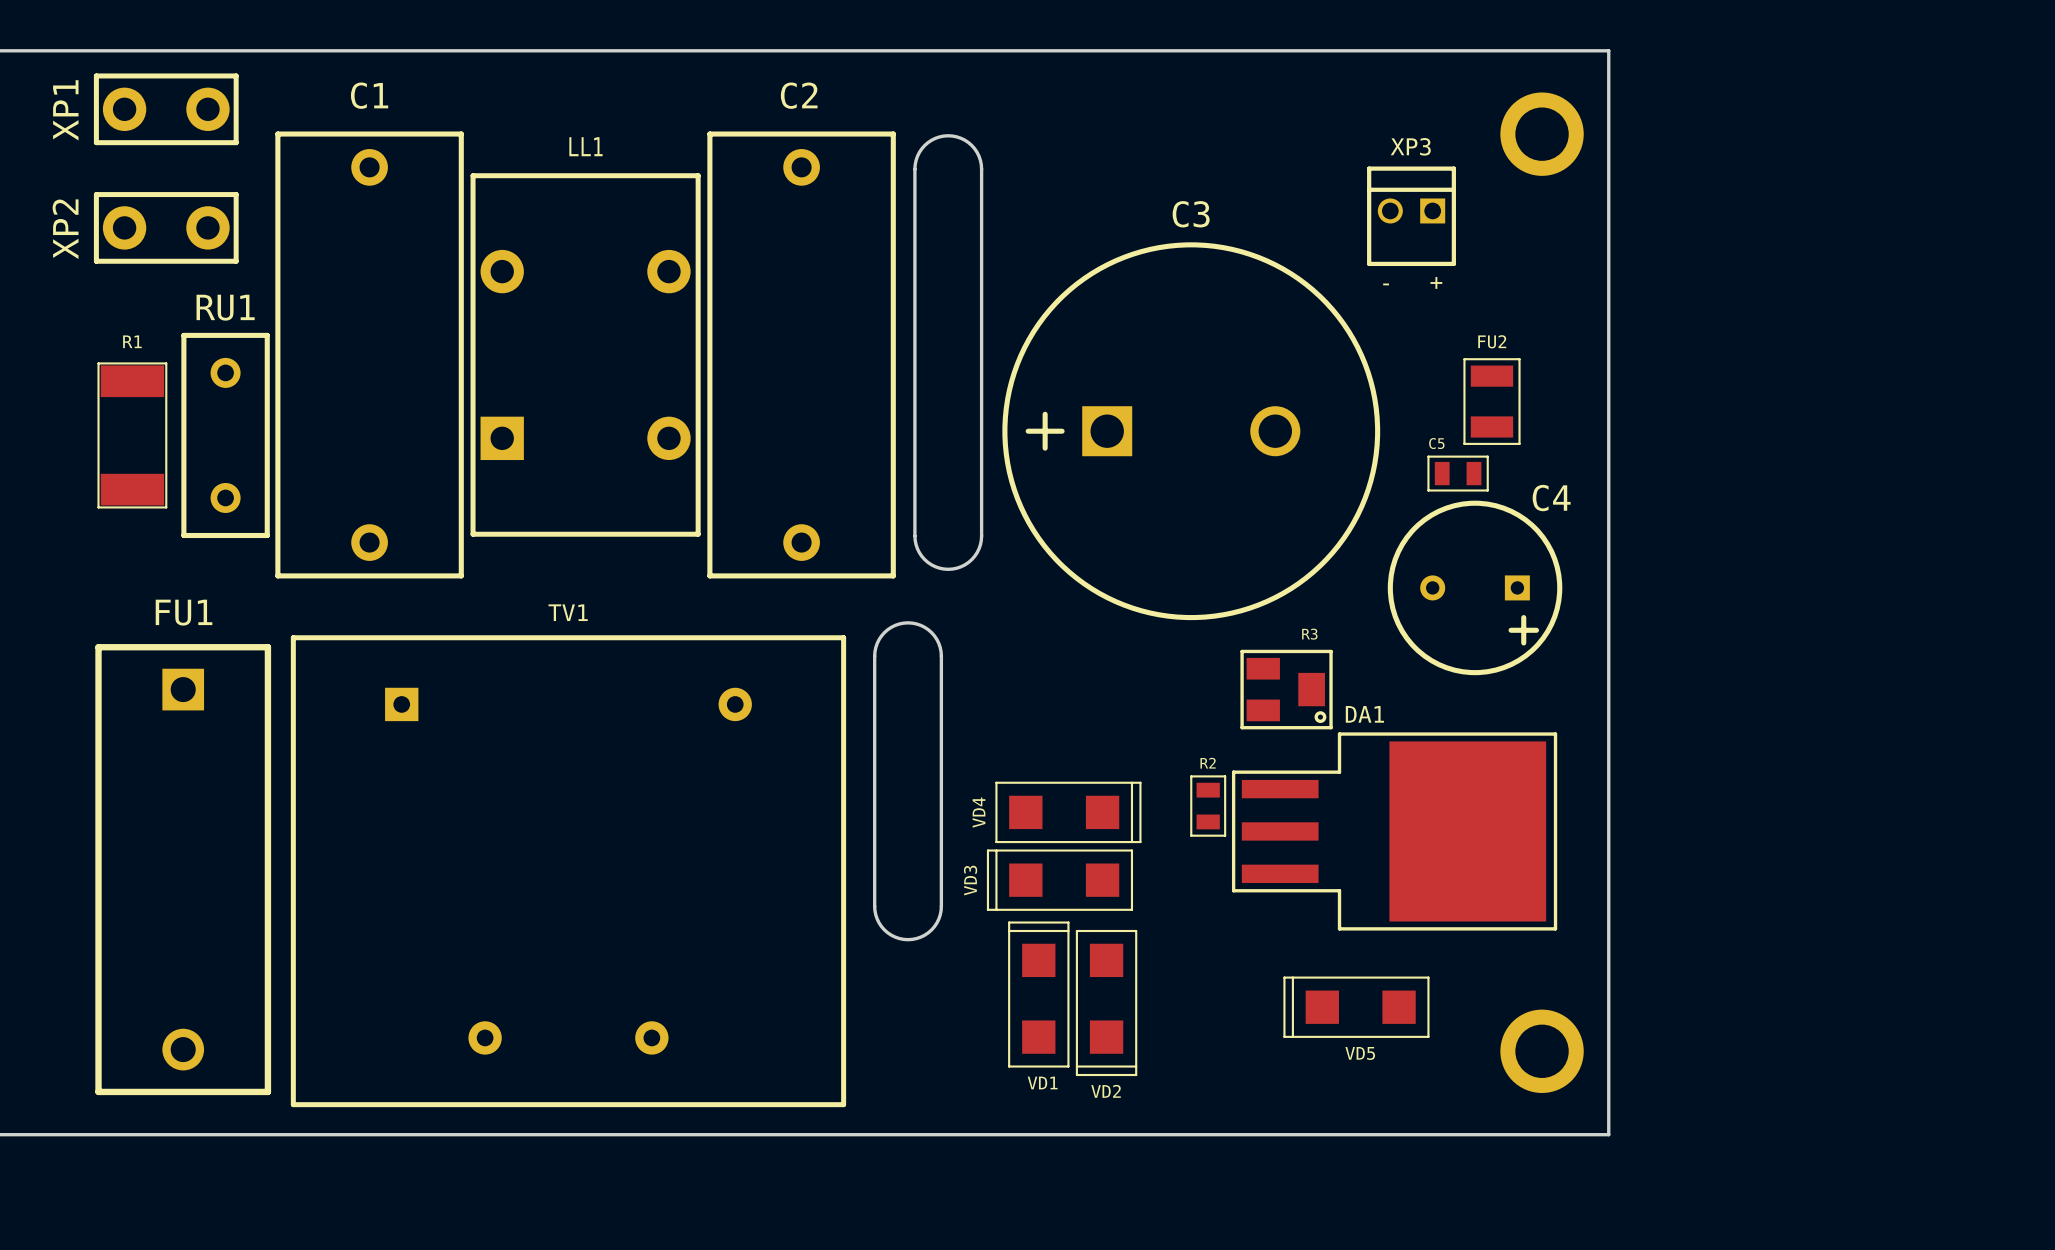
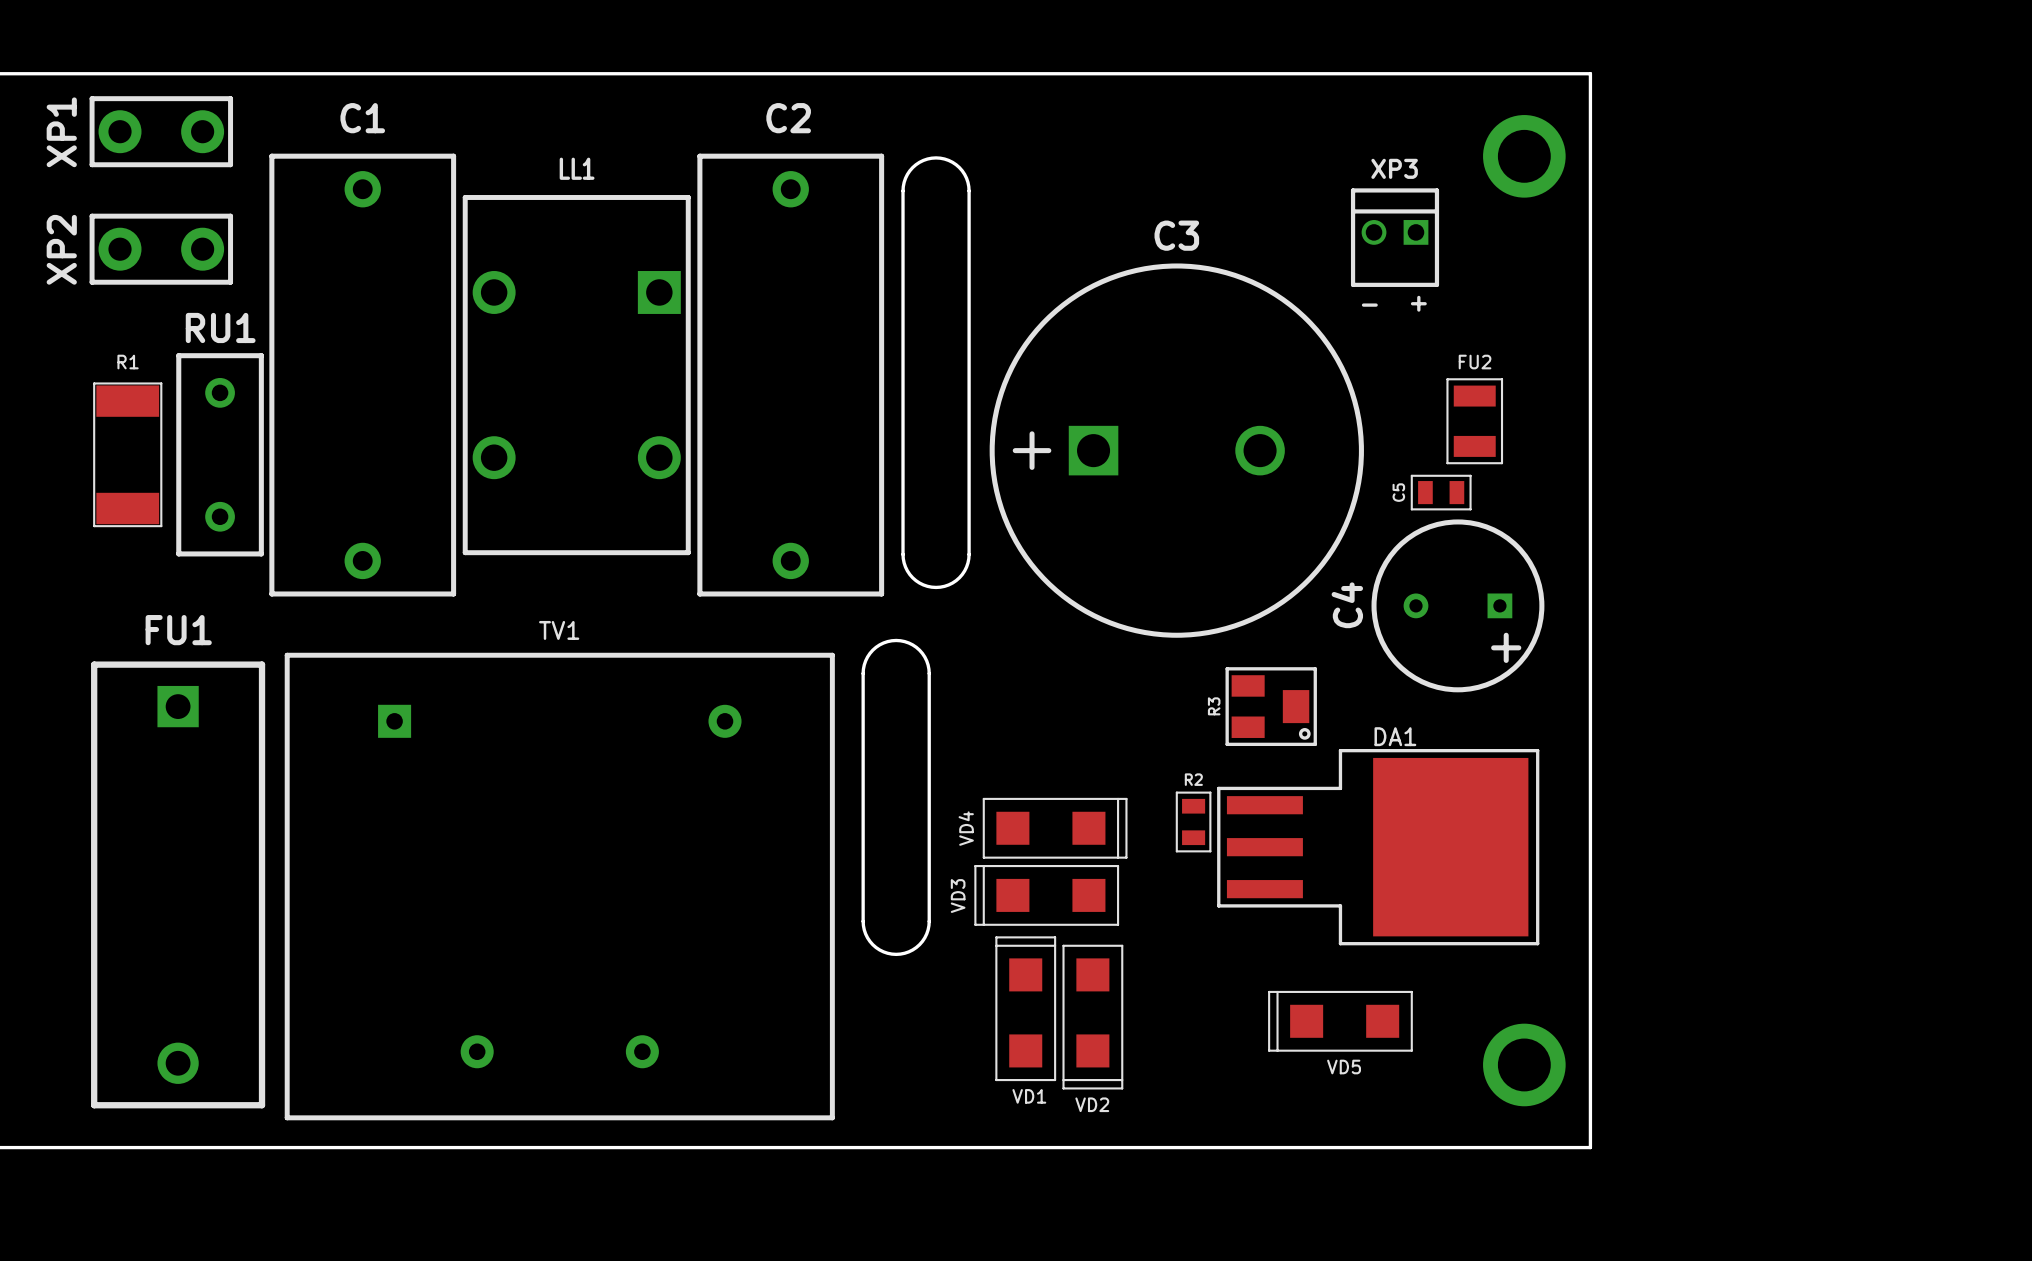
LL1 footprint: [470, 173, 701, 537] -> [462, 195, 691, 556]
C5 name rotation: 0° (1436, 443) -> 90° counterclockwise (1398, 492)
C5 name position: C5 (1436, 443) -> C5 (1398, 492)
C4 name rotation: 0° (1551, 498) -> 90° counterclockwise (1347, 605)
C4 name position: C4 (1551, 498) -> C4 (1347, 605)
R3 name rotation: 0° (1309, 634) -> 90° counterclockwise (1214, 706)
R3 name position: R3 (1309, 634) -> R3 (1214, 706)
DA1 name position: DA1 (1364, 714) -> DA1 (1395, 736)
DA1 footprint: [1231, 732, 1558, 931] -> [1217, 748, 1540, 946]

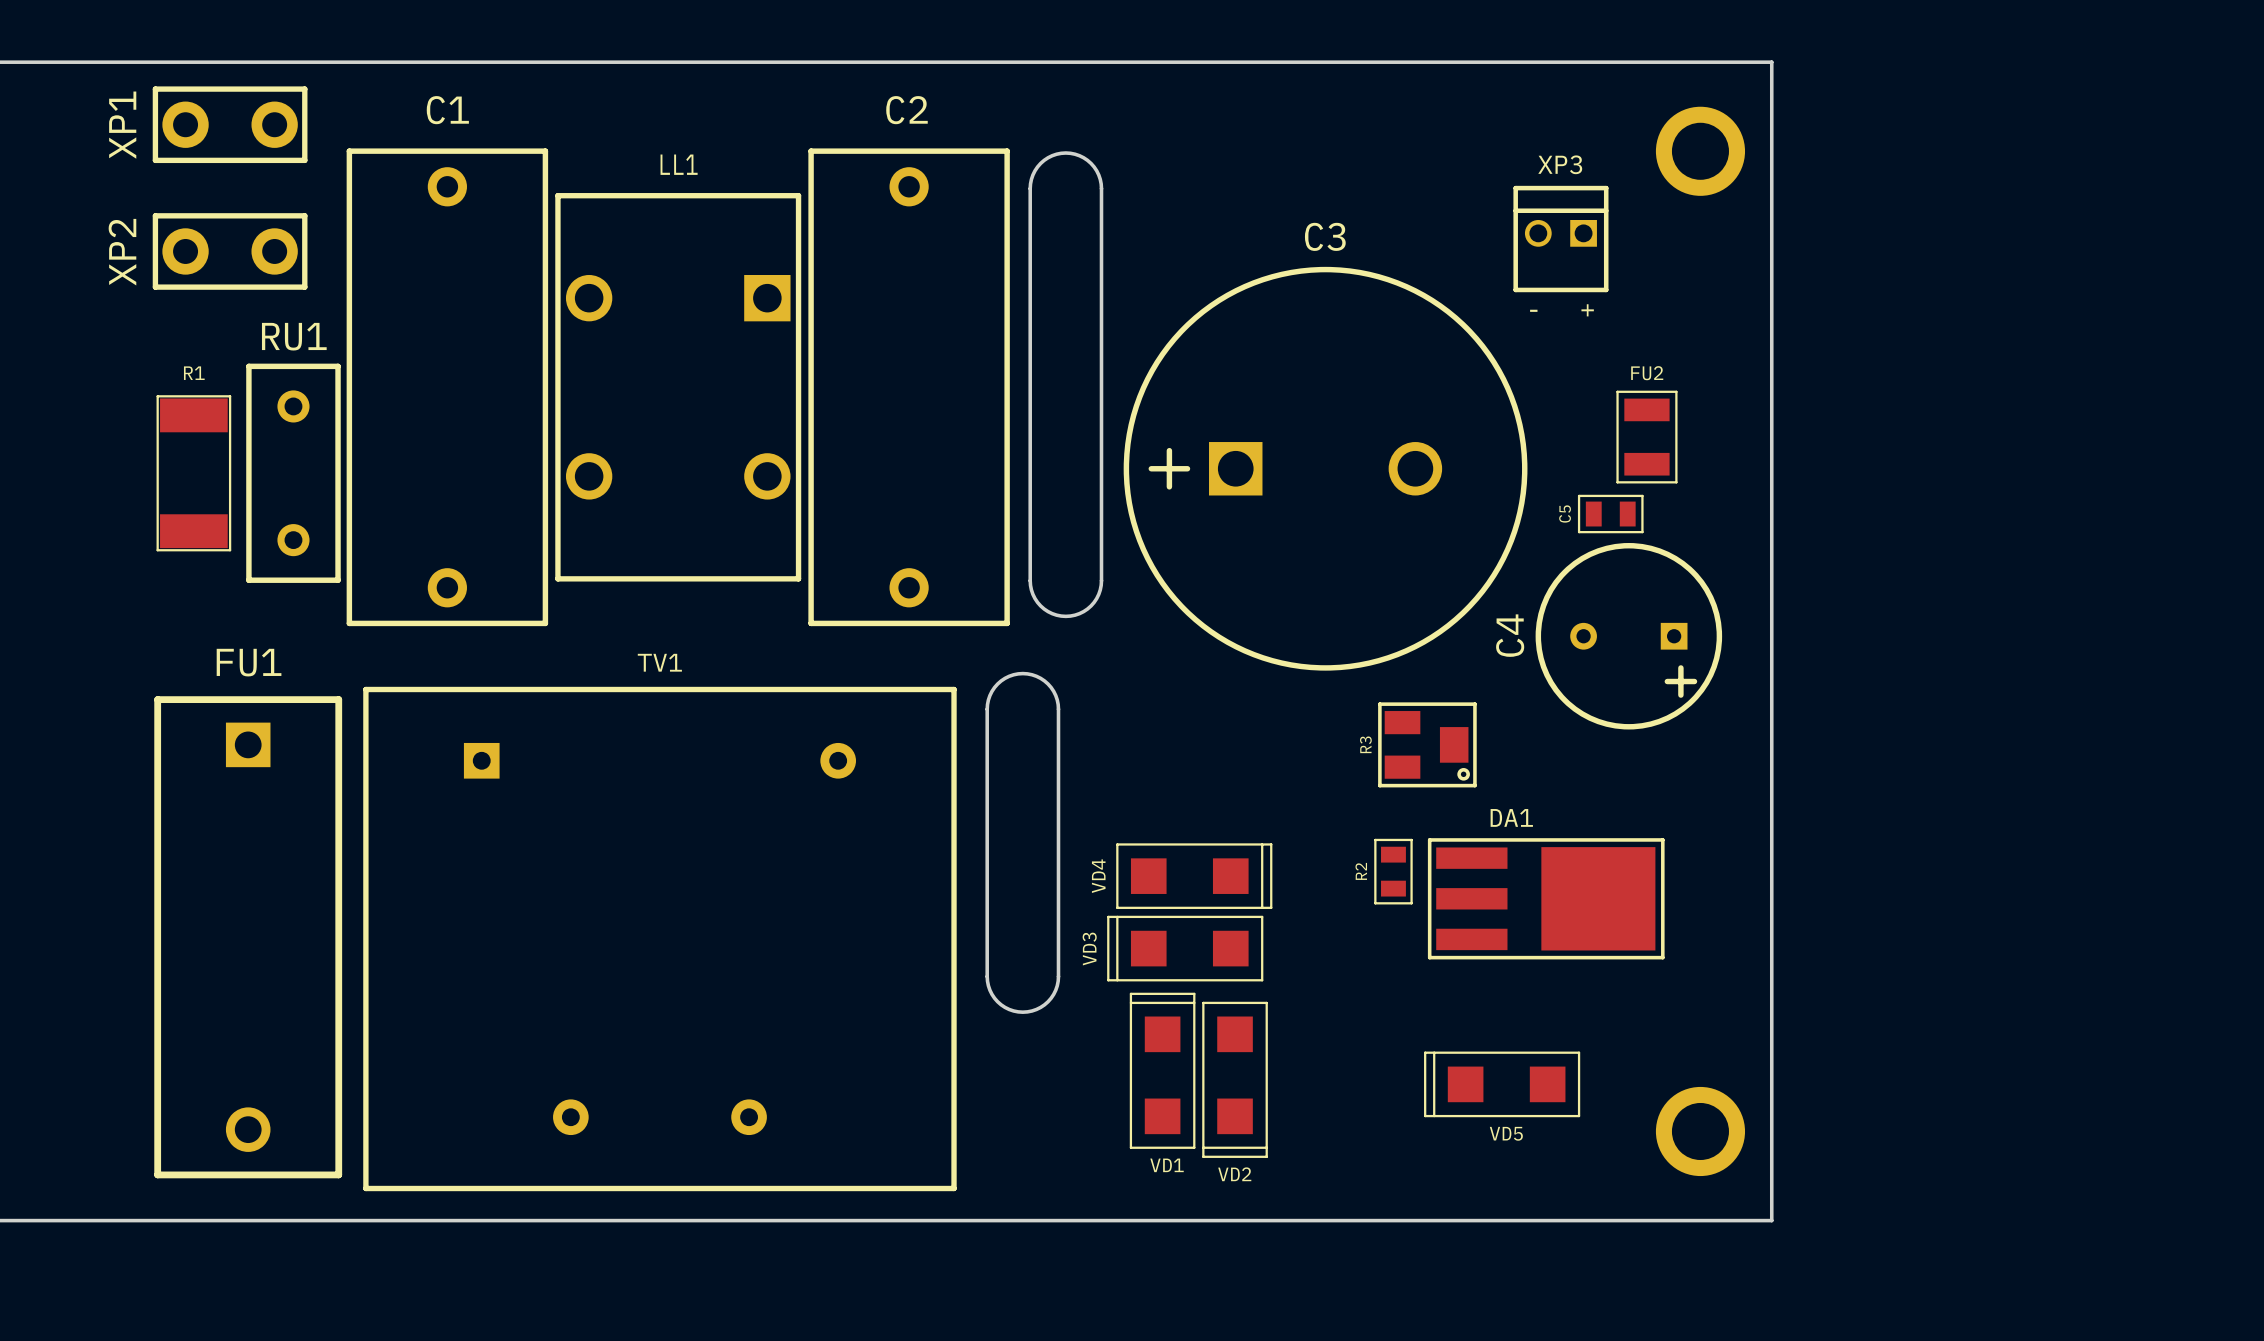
DA1 name position: DA1 (1395, 736) -> DA1 (1511, 817)
DA1 footprint: [1217, 748, 1540, 946] -> [1427, 838, 1665, 960]
R2 name rotation: 0° (1193, 779) -> 90° counterclockwise (1361, 871)
R2 name position: R2 (1193, 779) -> R2 (1361, 871)
R2 position: (1193, 821) -> (1393, 871)

